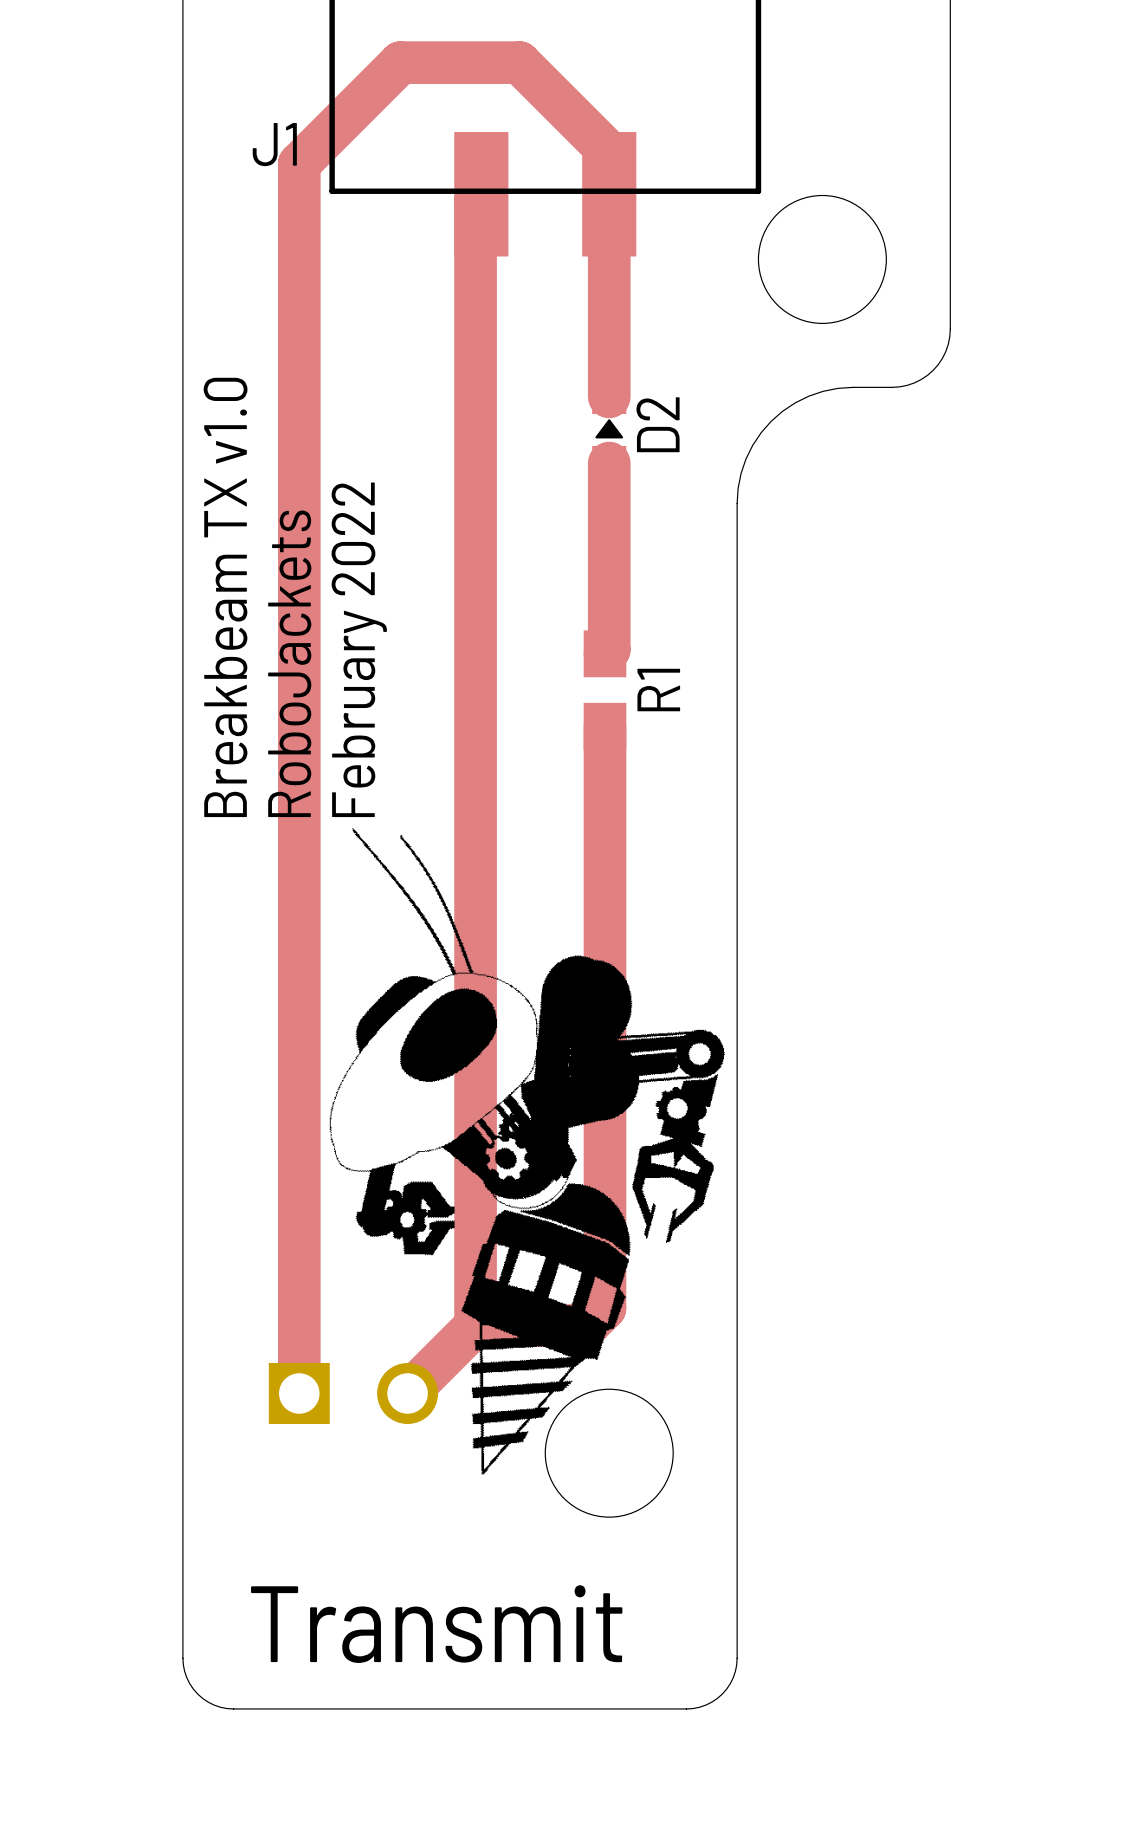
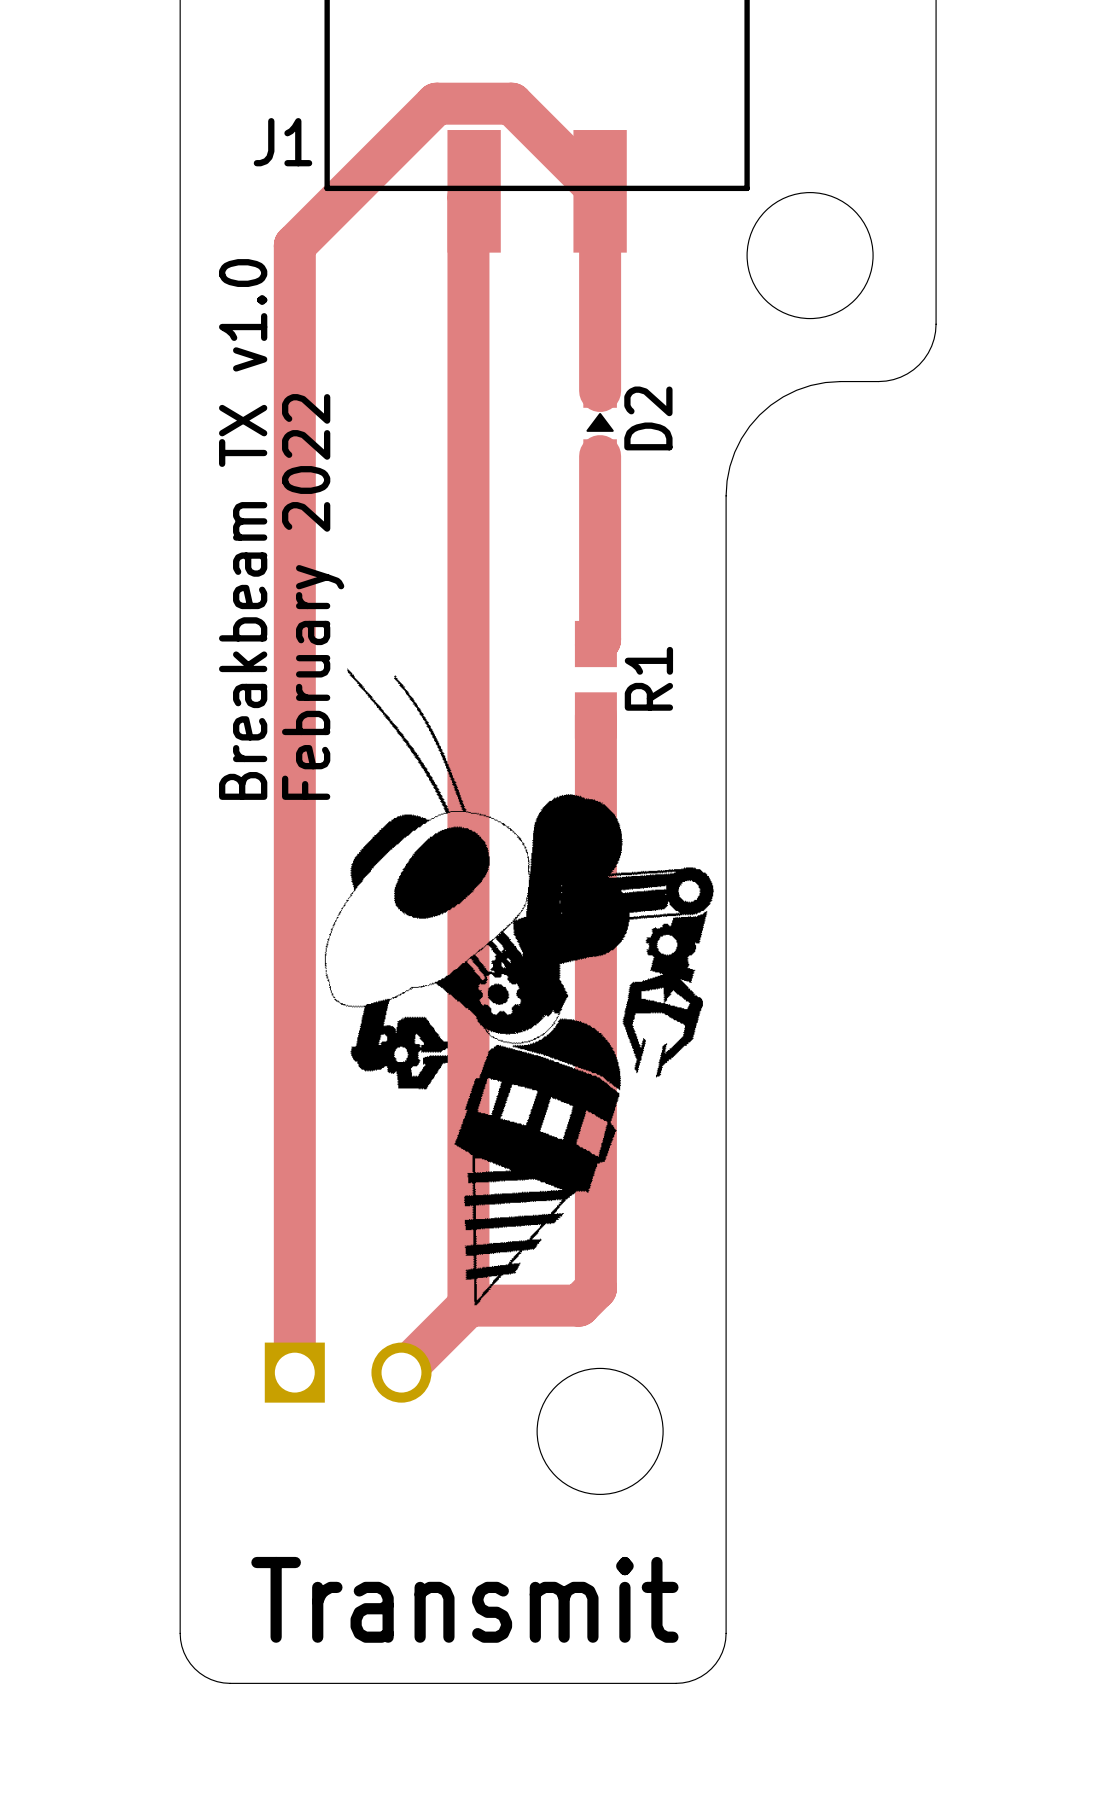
track: (609, 194) (609, 152) (519, 62) (400, 62) (299, 163) (299, 249) -> (599, 191) (511, 103) (436, 103) (294, 245)
text position: Breakbeam TX v1.0 (225, 597) -> Breakbeam TX v1.0 (243, 529)
text position: February 2022 (359, 649) -> February 2022 (313, 596)
text: RoboJackets (289, 663) -> none
drawing position: (527, 1151) -> (519, 986)

